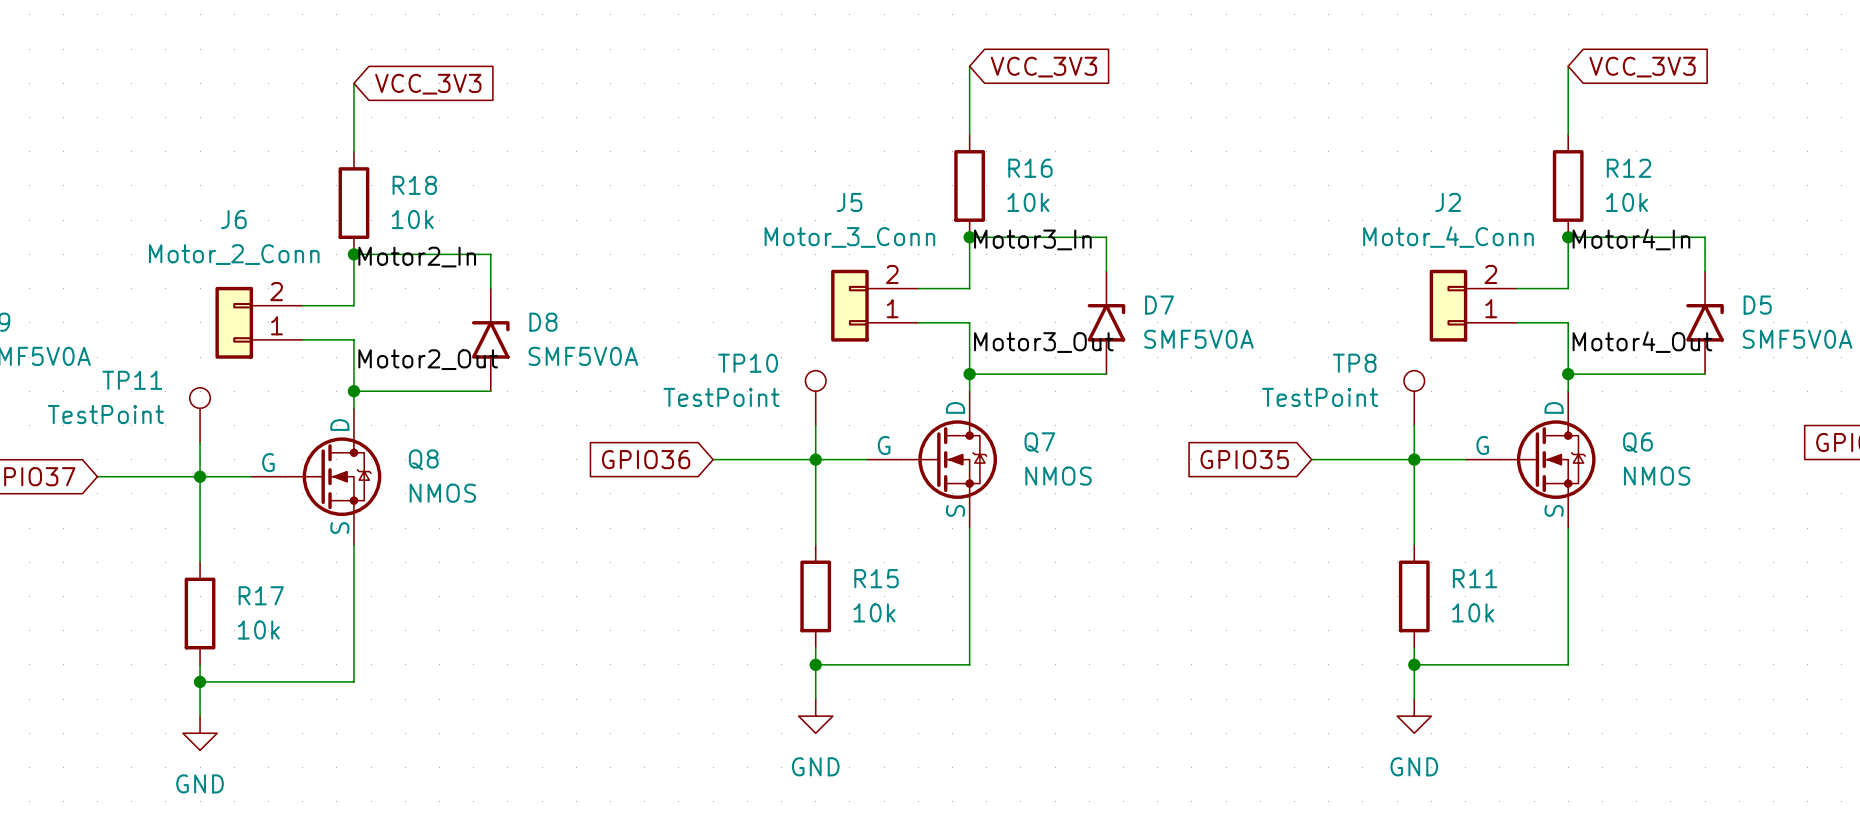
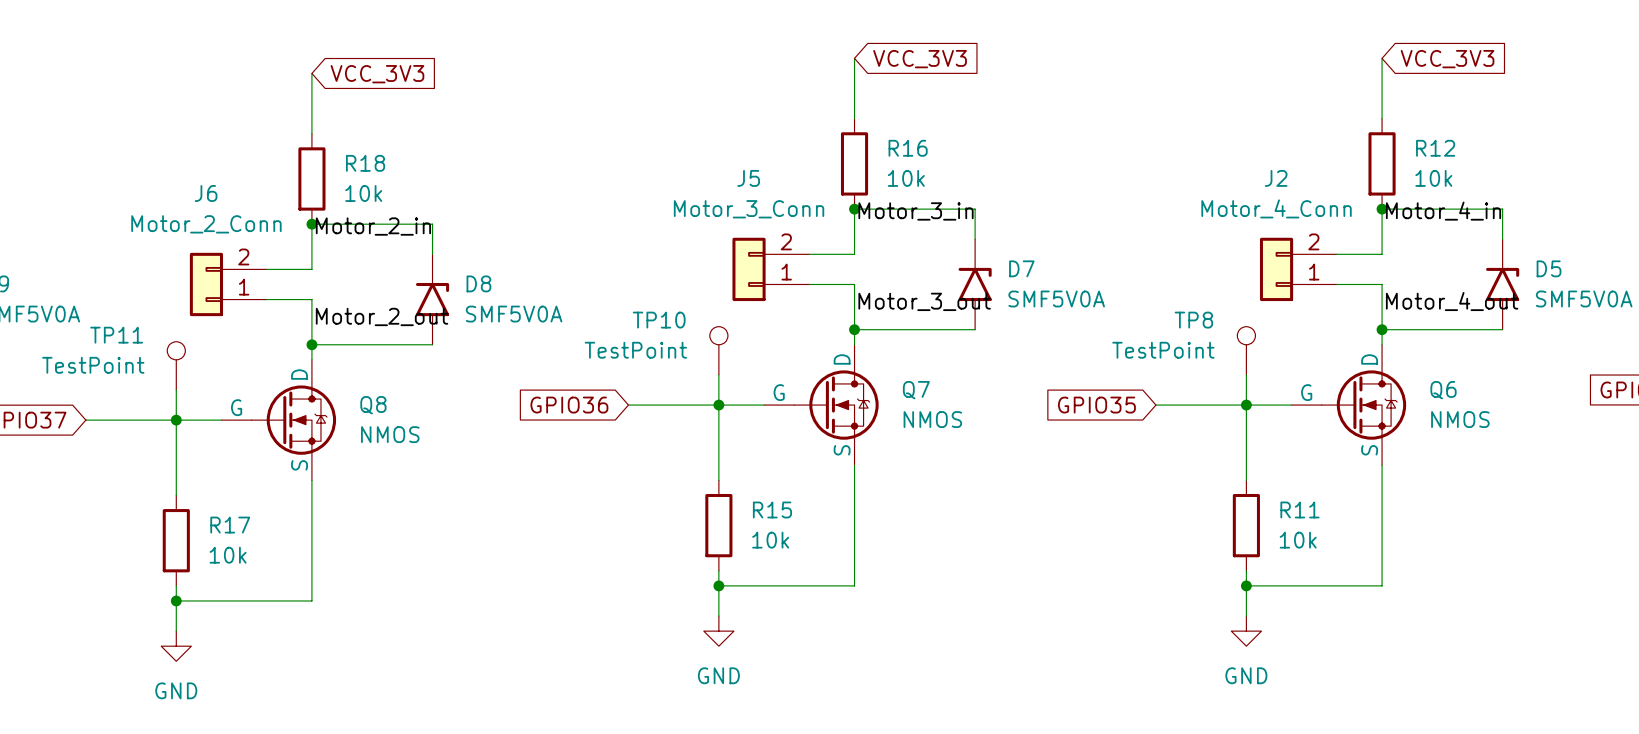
label: Motor3_In (1032, 239) -> Motor_3_in (916, 211)
label: Motor4_In (1631, 239) -> Motor_4_in (1443, 211)
label: Motor2_In (417, 257) -> Motor_2_in (373, 226)
label: Motor3_Out (1043, 342) -> Motor_3_out (924, 301)
label: Motor4_Out (1642, 342) -> Motor_4_out (1452, 301)
label: Motor2_Out (428, 359) -> Motor_2_out (382, 316)

